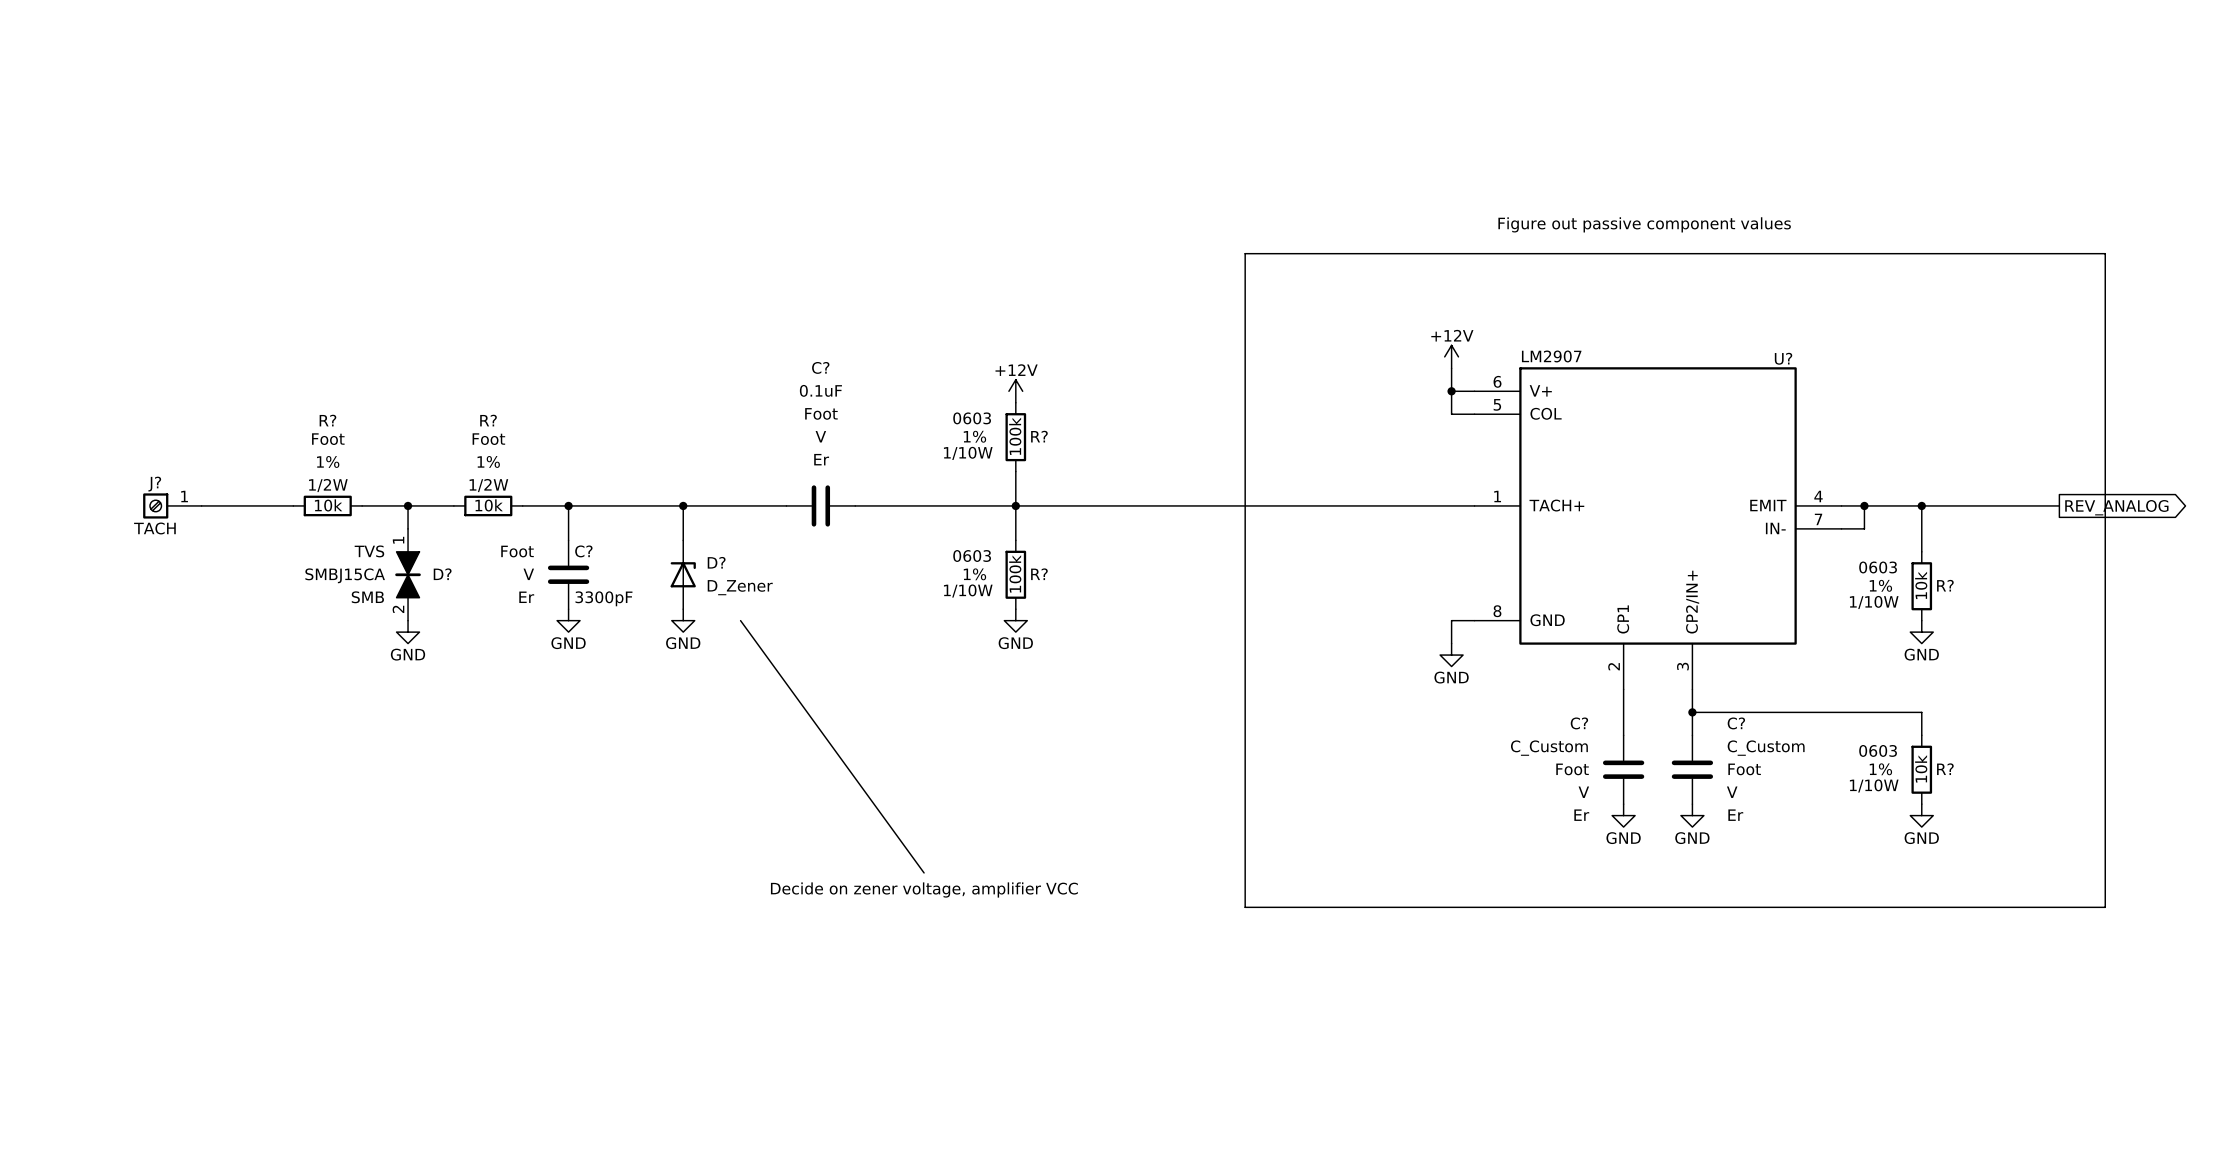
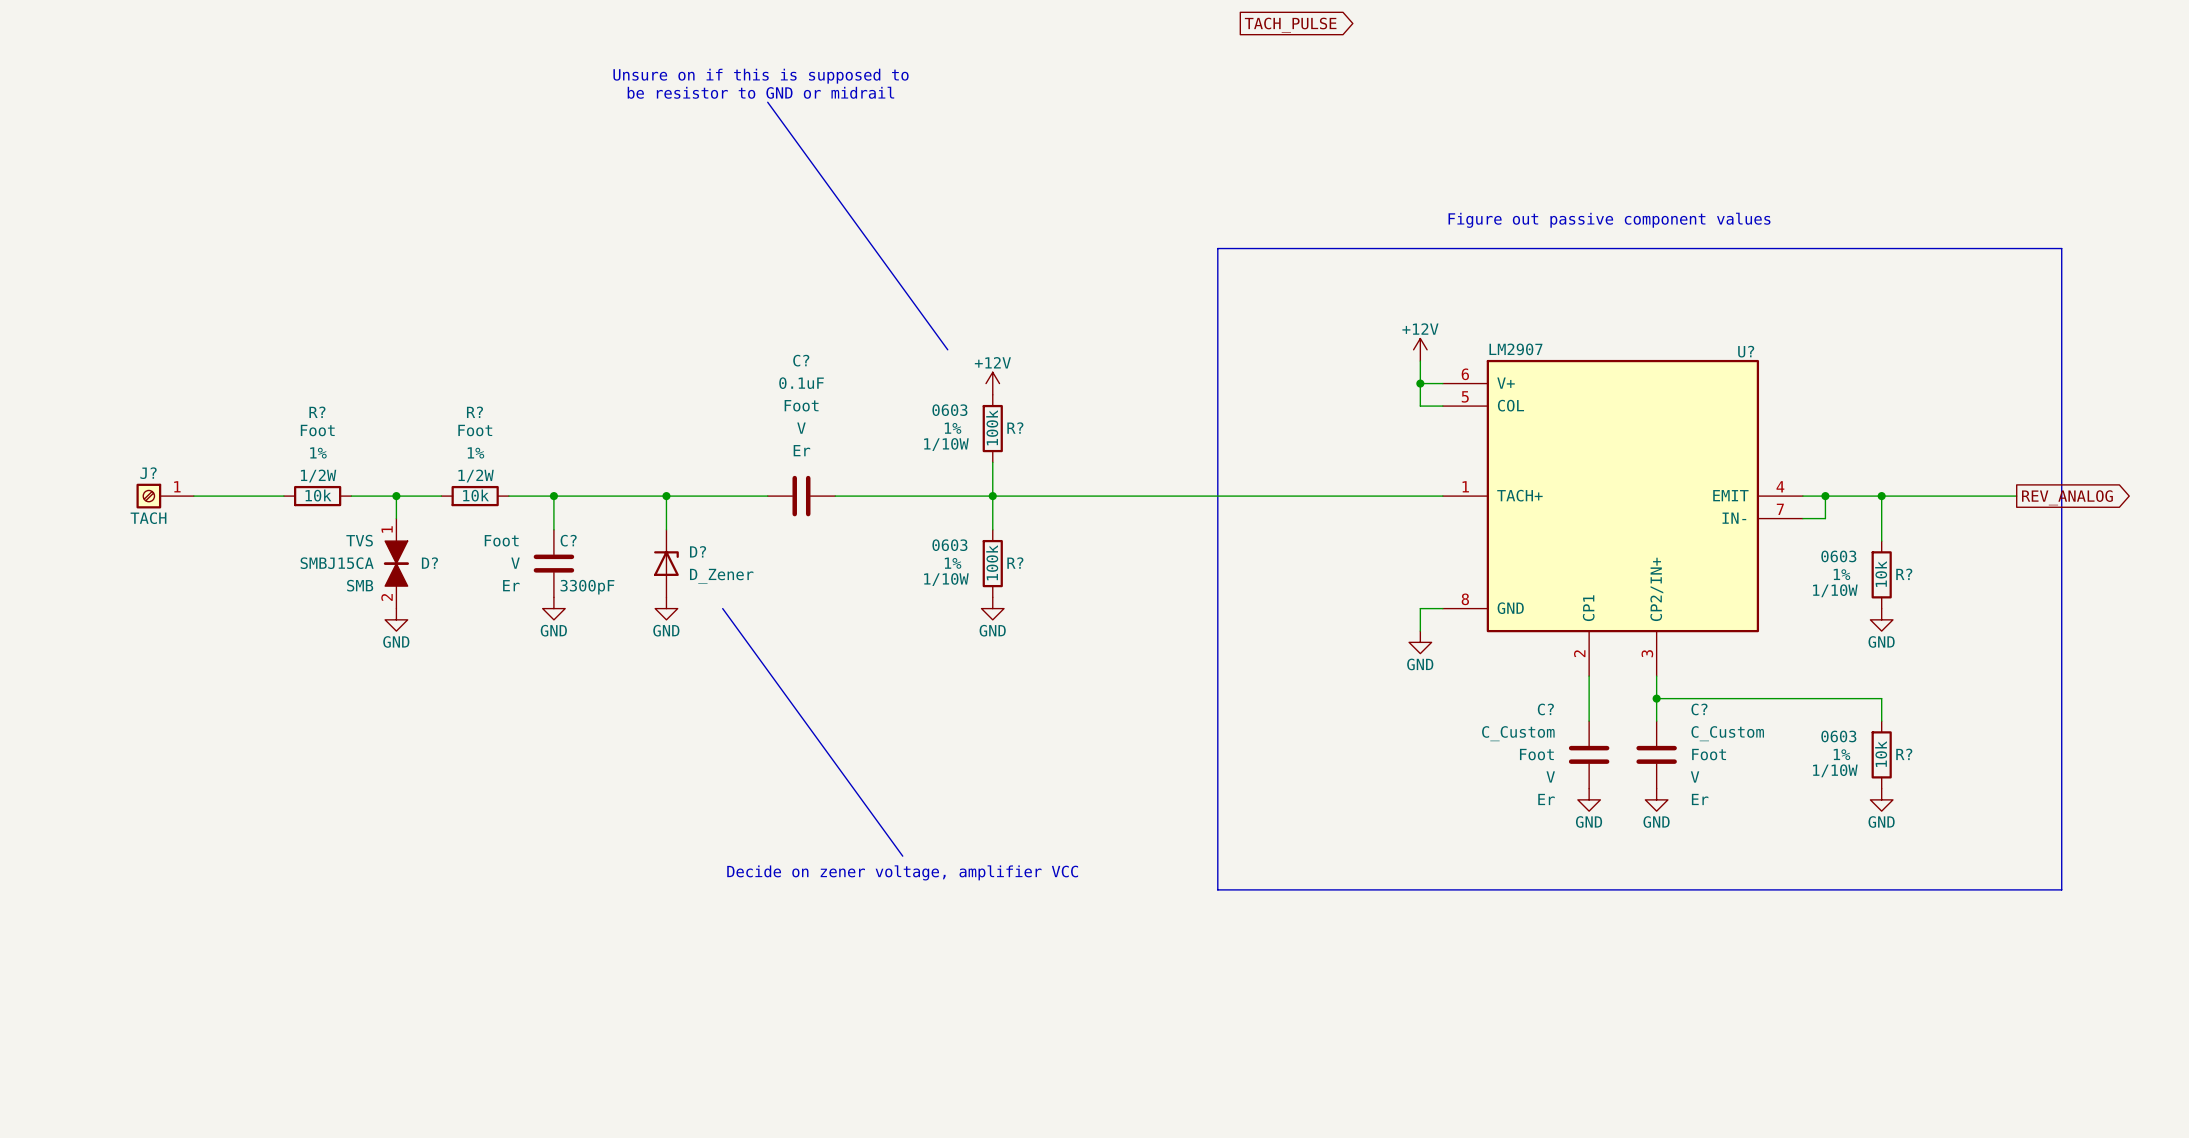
global label: none -> TACH_PULSE (1290, 25)
text: none -> Unsure on if this is supposed to (761, 76)
text: none -> be resistor to GND or midrail (760, 92)
line: none -> (767, 102) (947, 349)

